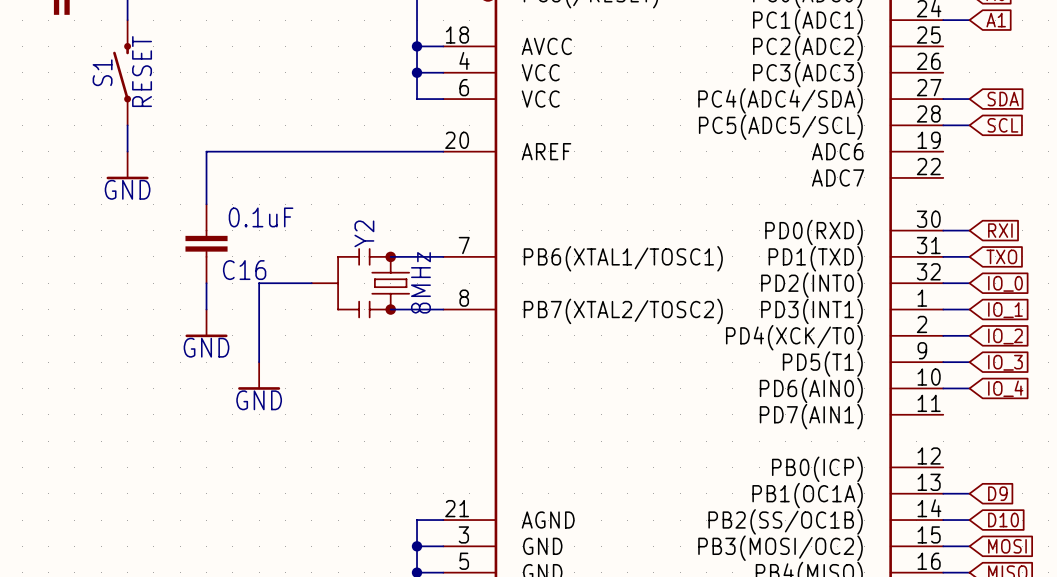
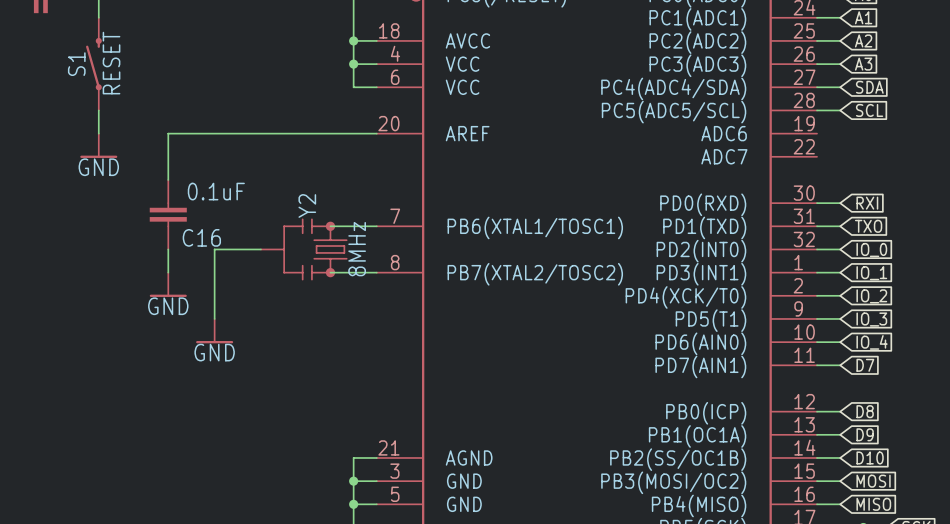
wire: none -> (817, 40) (840, 40)
global label: none -> A2 (863, 40)
wire: none -> (817, 64) (840, 64)
global label: none -> A3 (863, 64)
wire: none -> (817, 365) (840, 365)
global label: none -> D7 (865, 365)
wire: none -> (817, 411) (840, 411)
global label: none -> D8 (865, 411)

